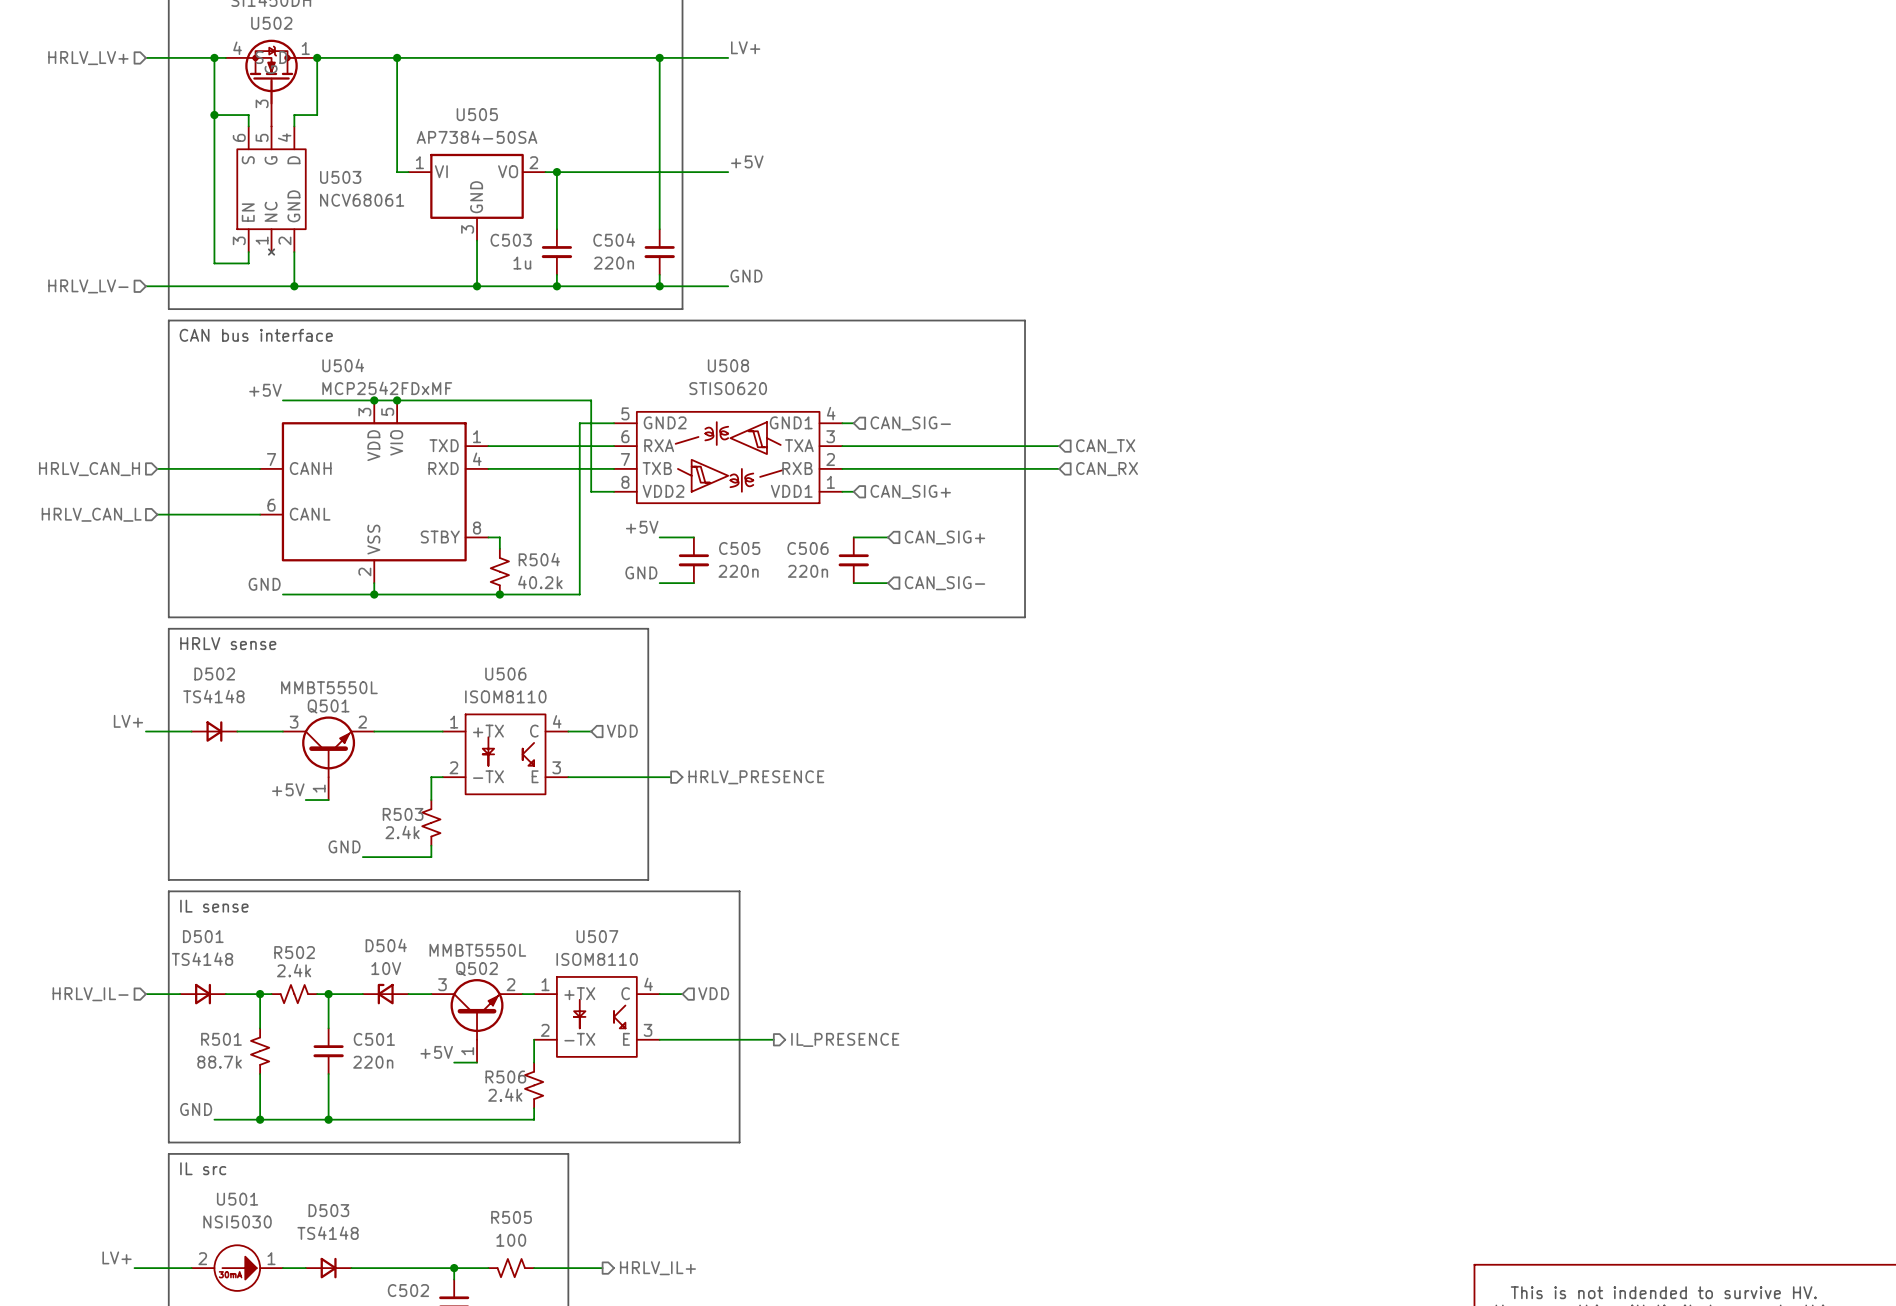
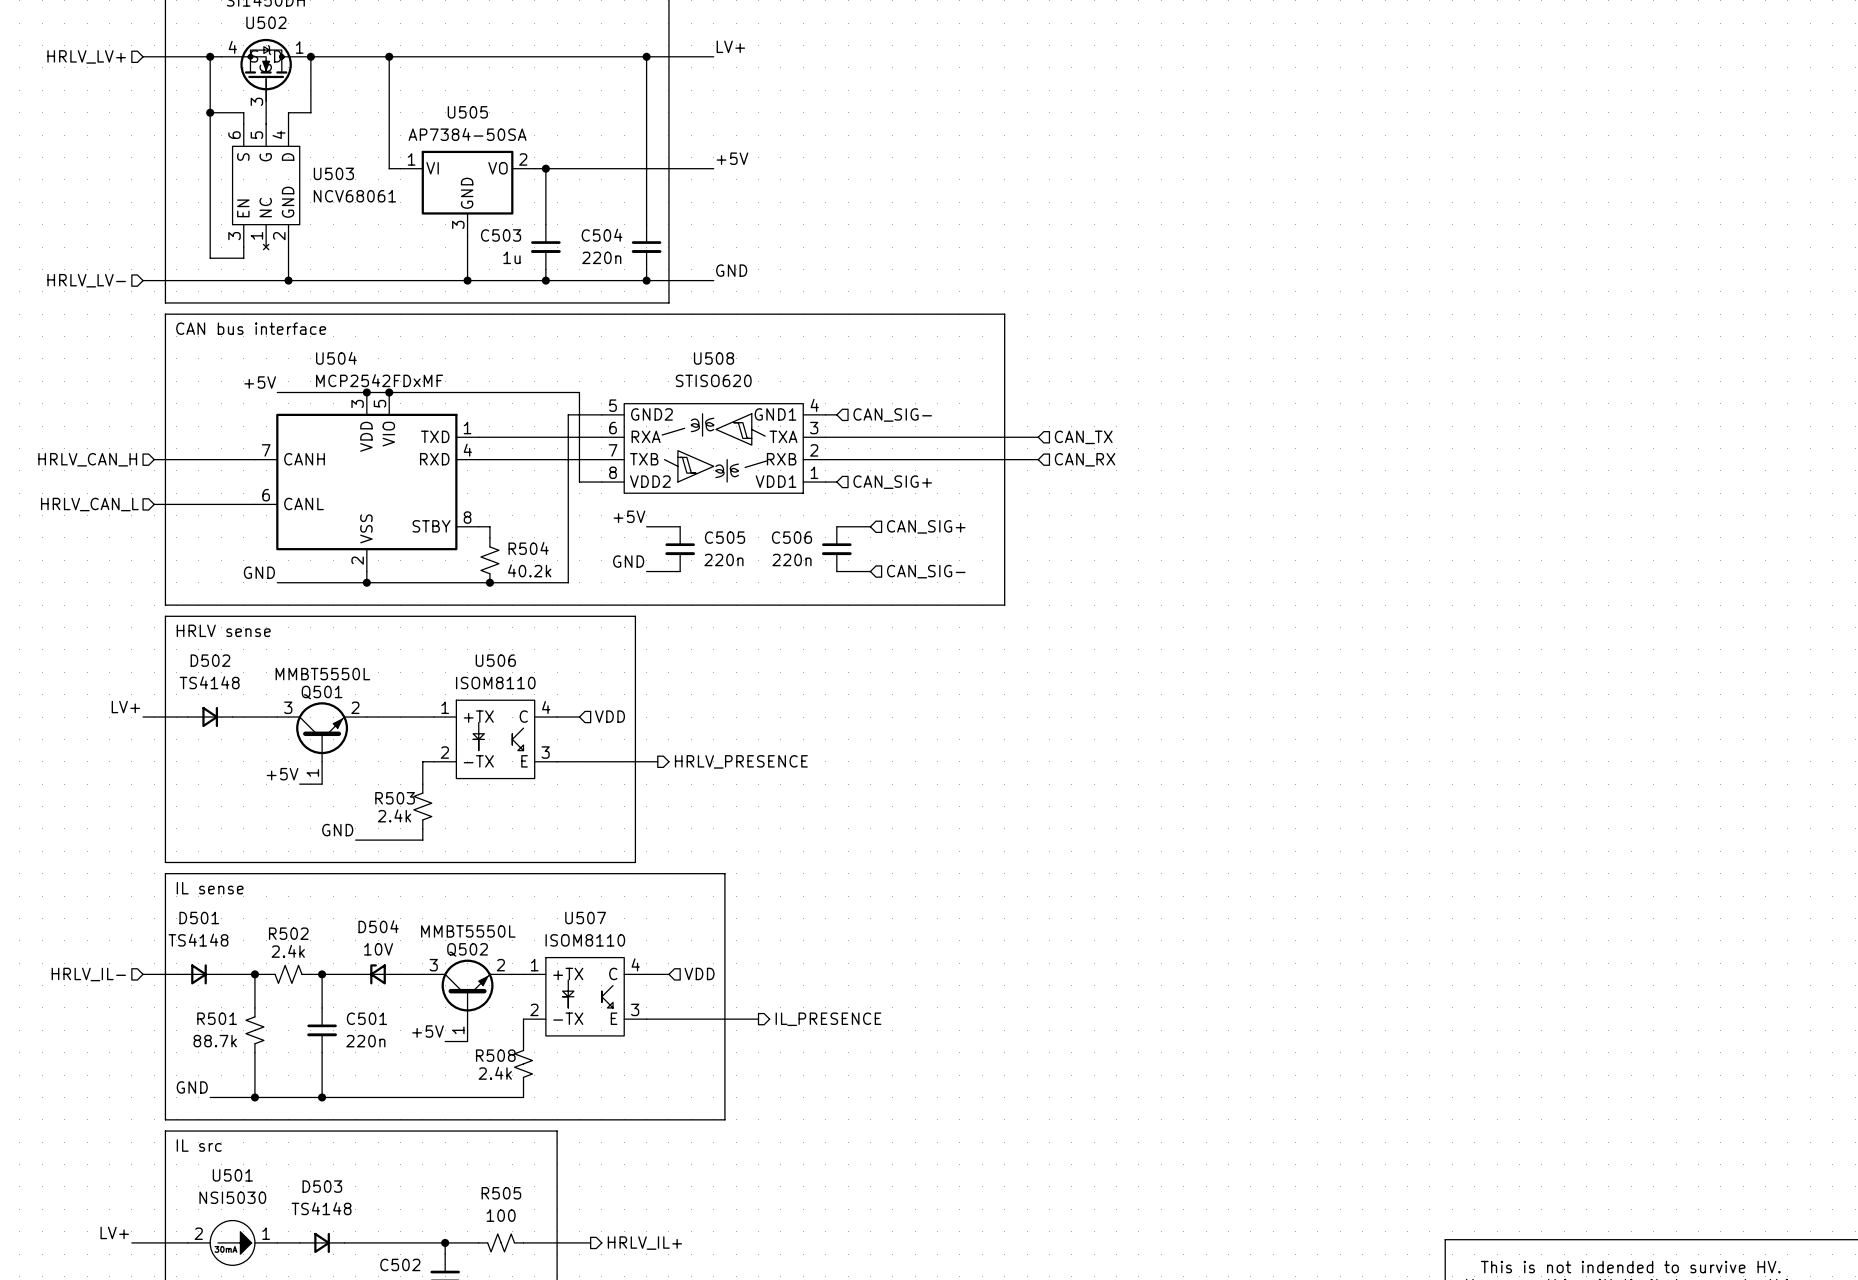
R506 name: R506 (505, 1077) -> R508 (495, 1055)

